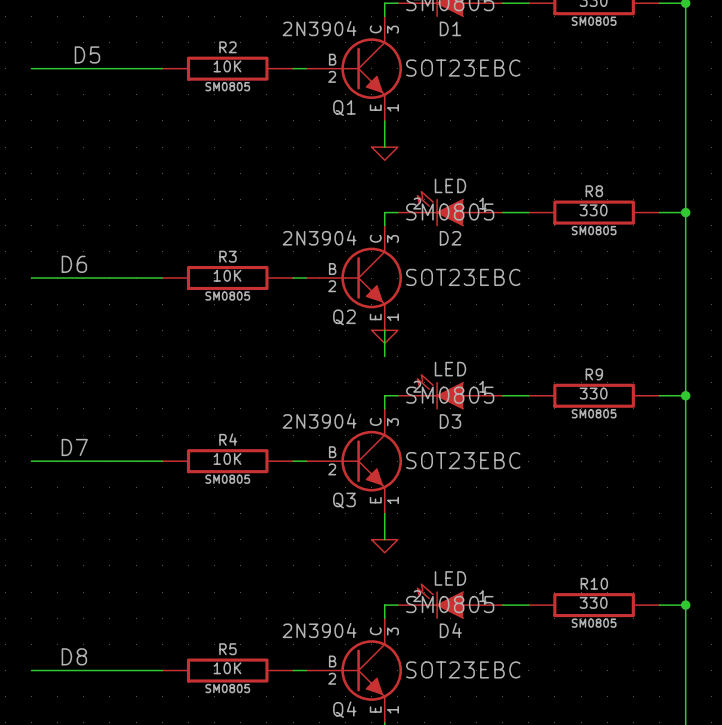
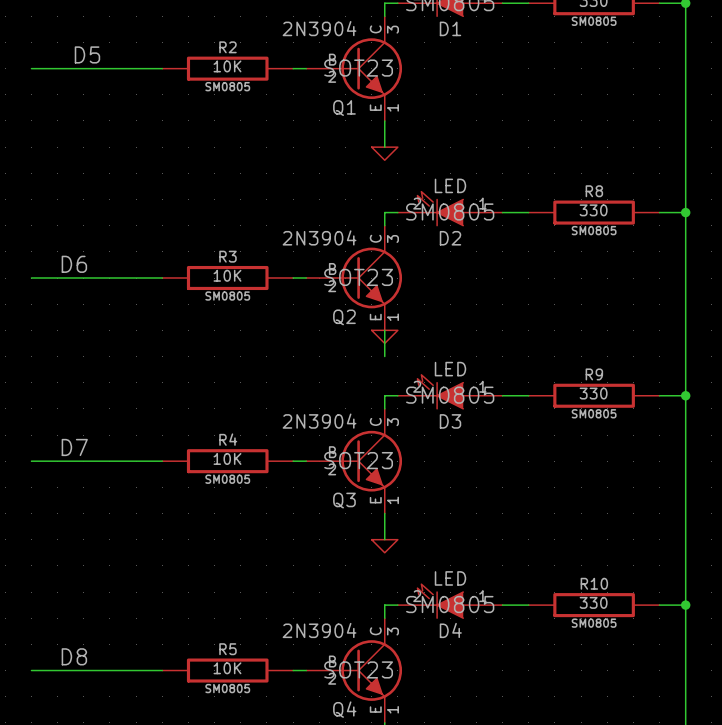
Q1 text: SOT23EBC (463, 68) -> SOT23 (358, 68)
Q2 text: SOT23EBC (463, 277) -> SOT23 (358, 277)
Q3 text: SOT23EBC (463, 460) -> SOT23 (358, 460)
Q4 text: SOT23EBC (463, 669) -> SOT23 (358, 669)

